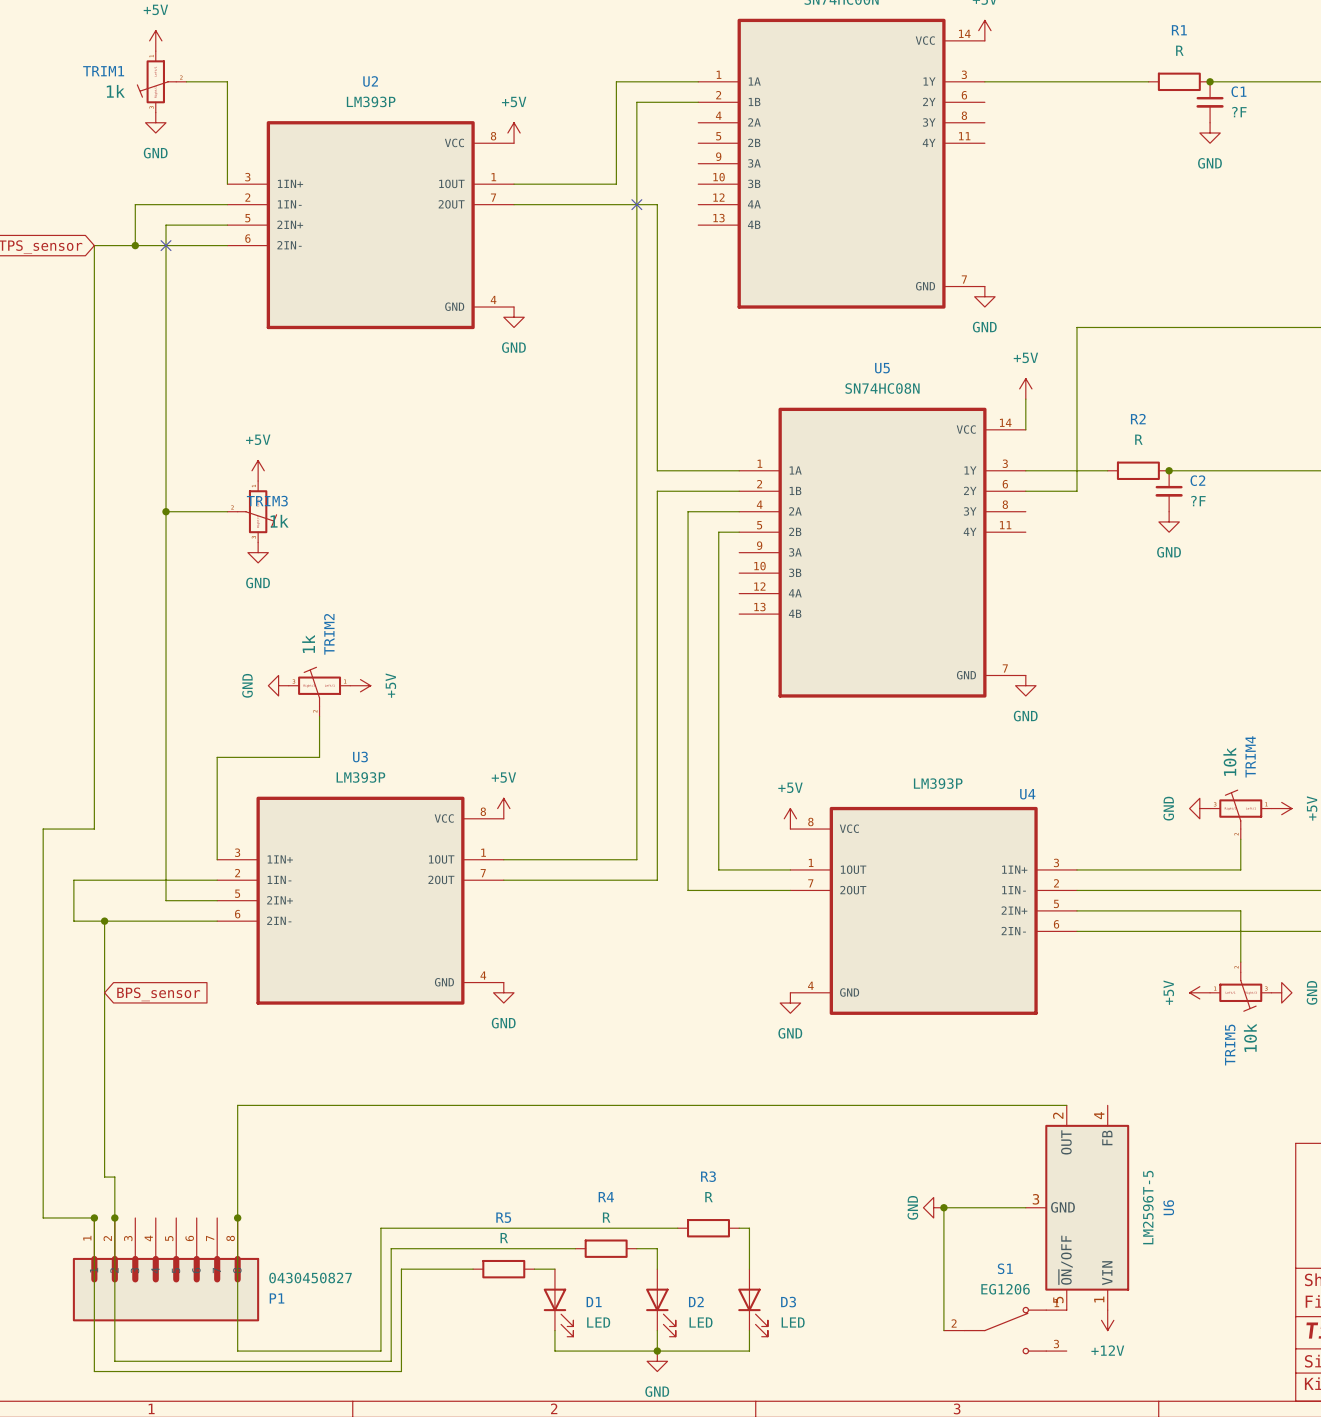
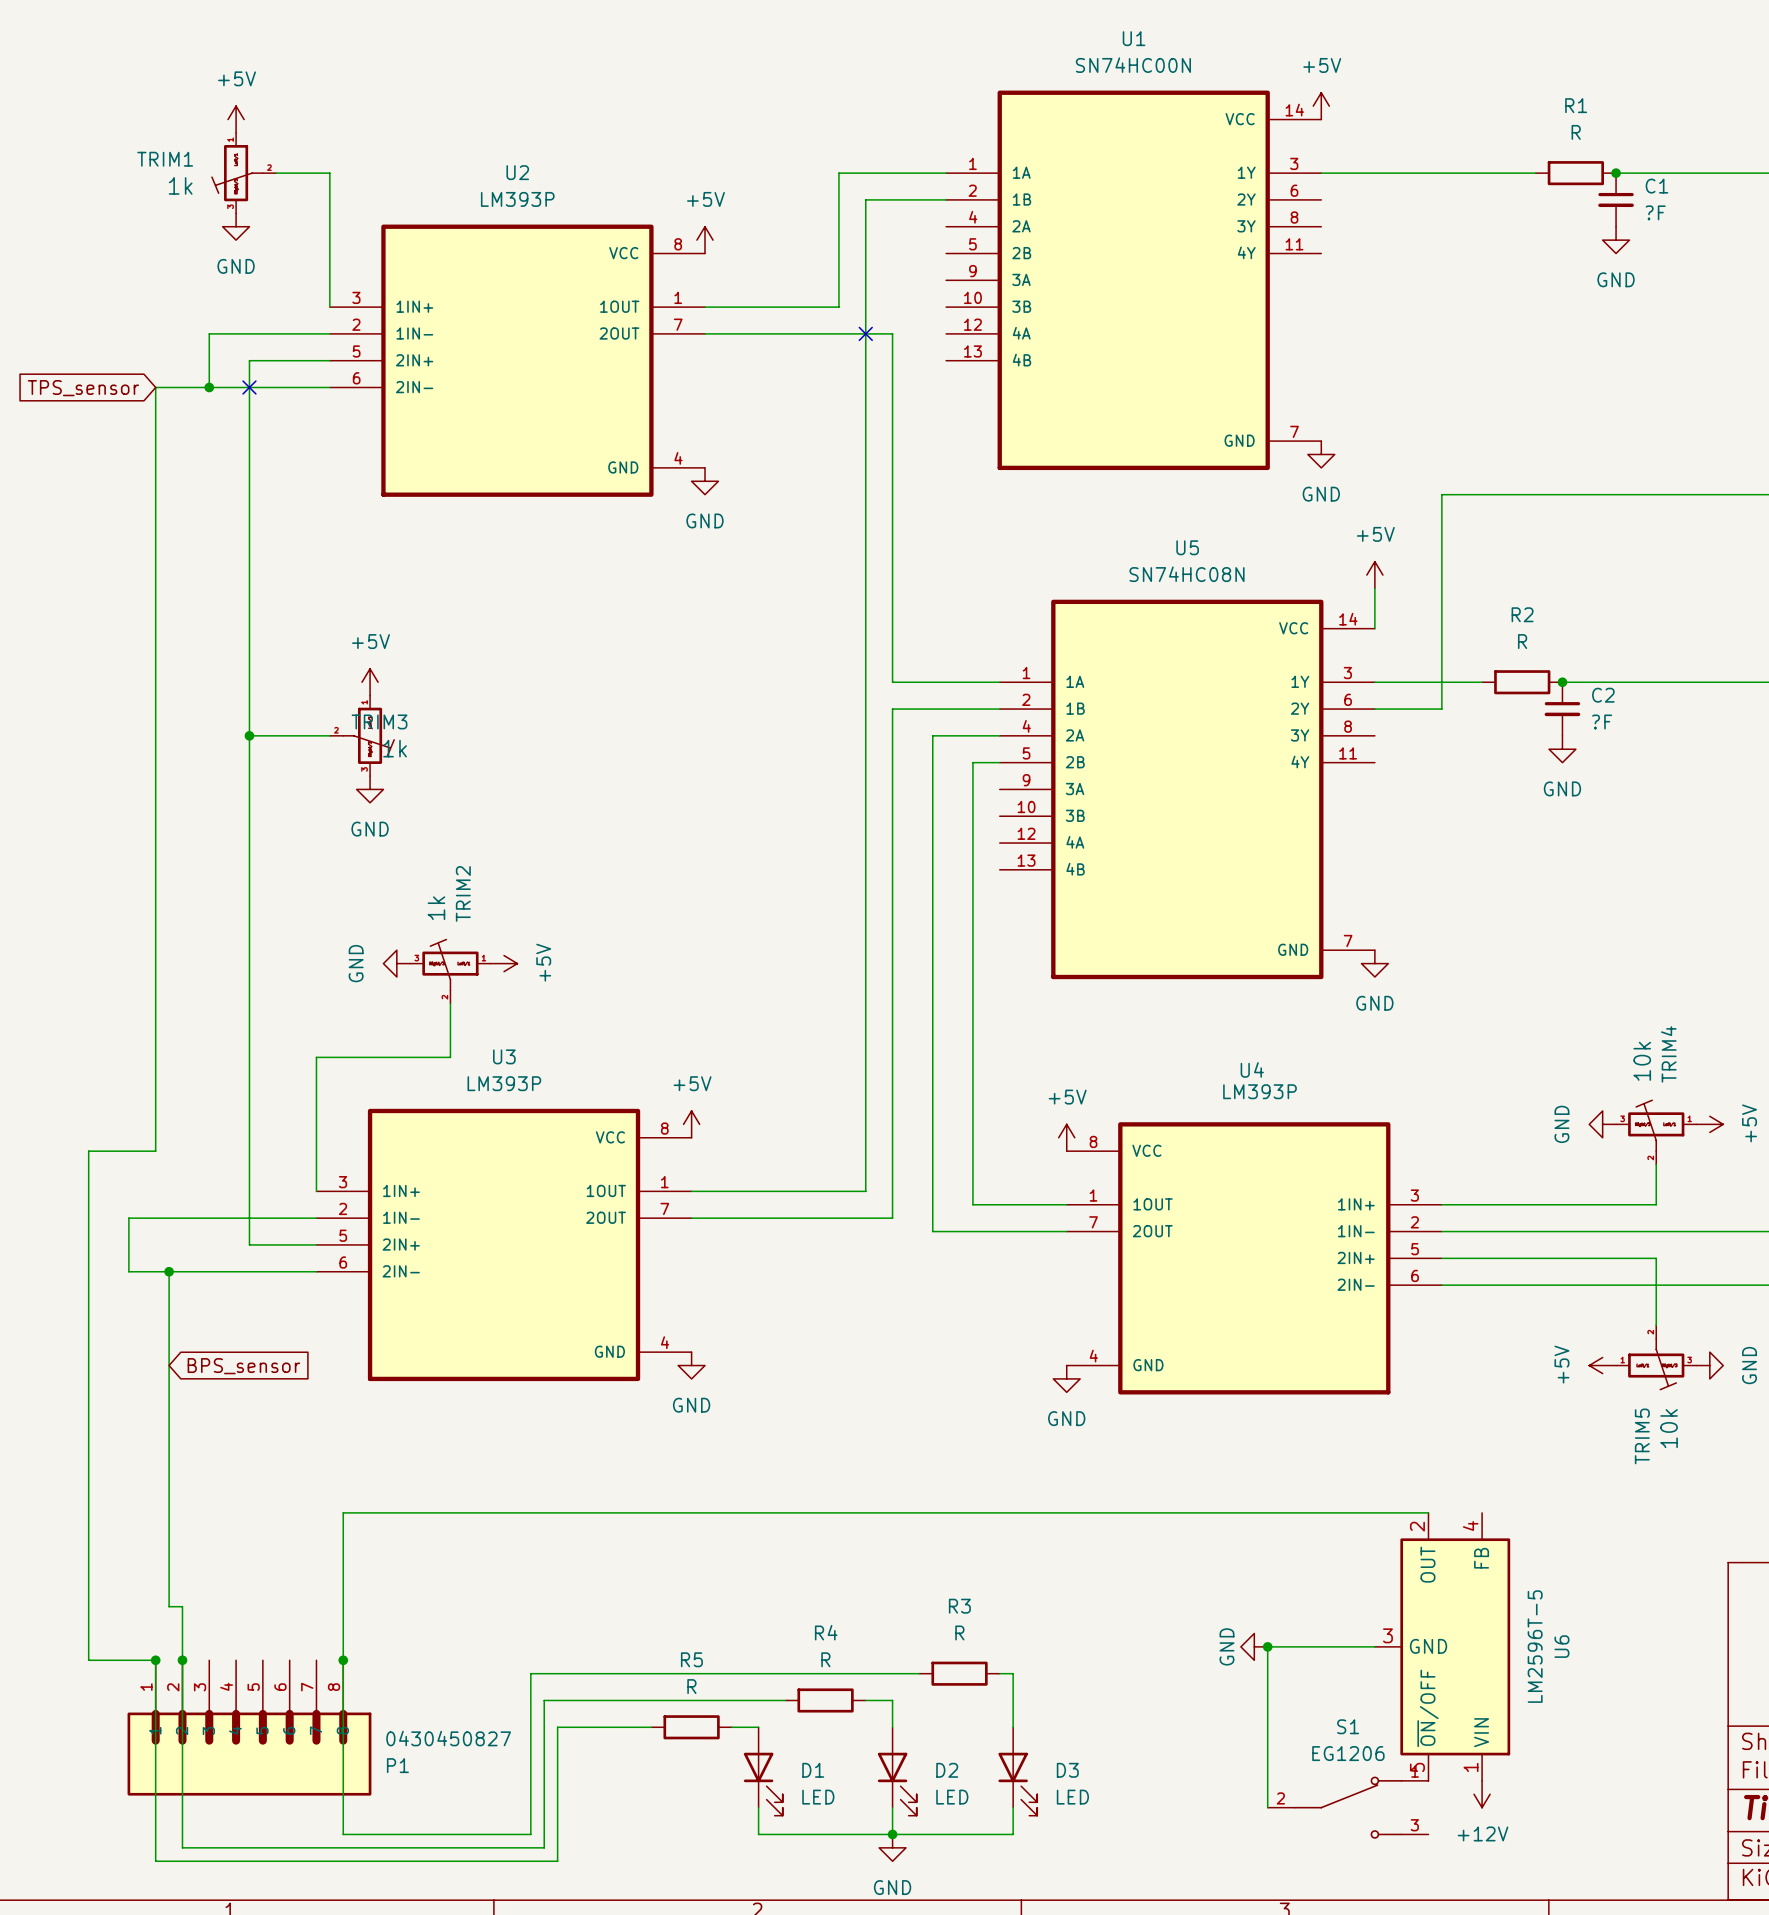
U4 name position: U4 (1027, 794) -> U4 (1252, 1069)

